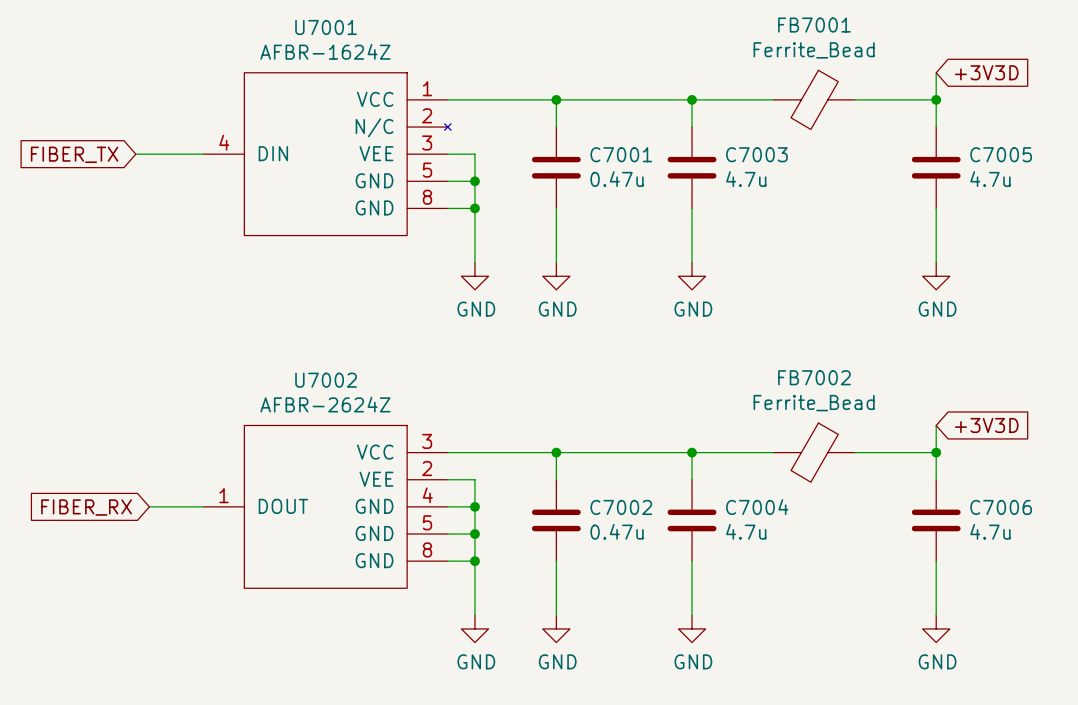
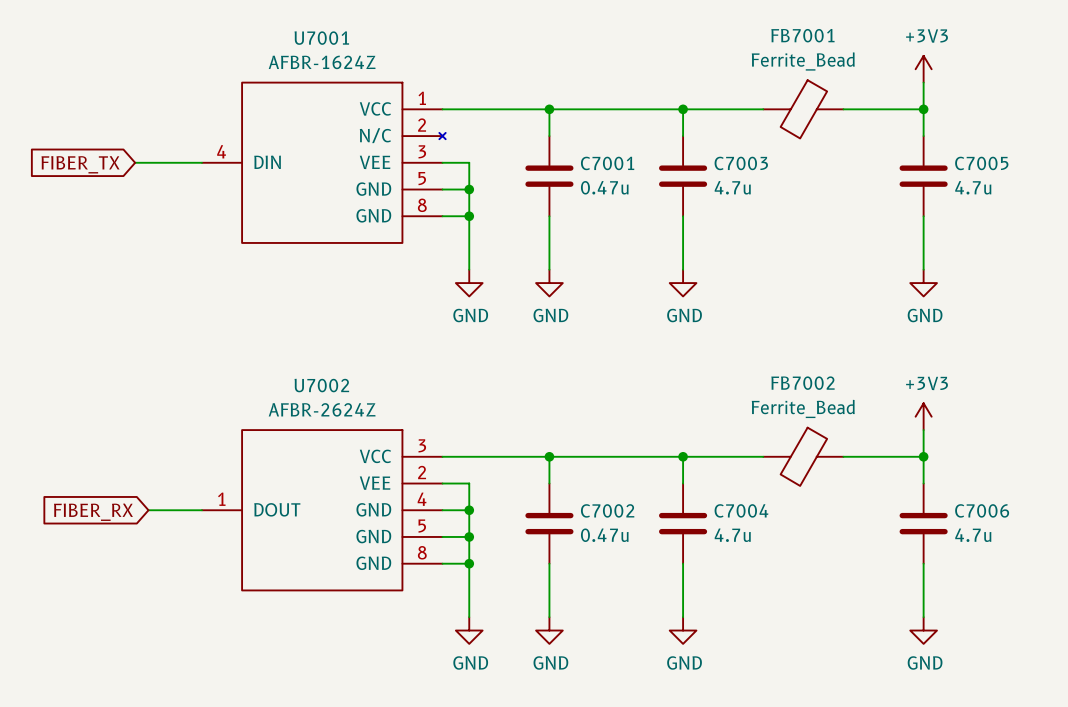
power symbol: none -> +3V3 (923, 69)
global label: +3V3D (986, 72) -> none
power symbol: none -> +3V3 (923, 416)
global label: +3V3D (986, 425) -> none

